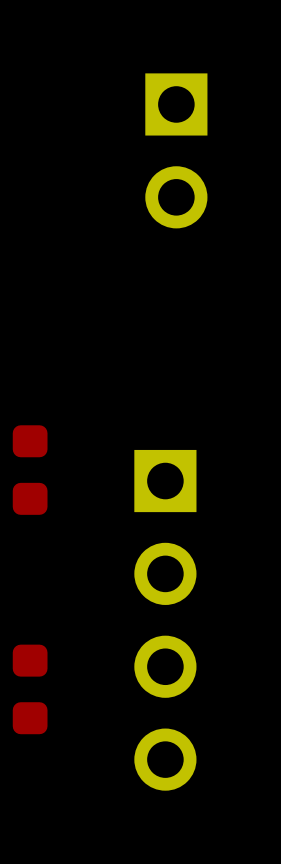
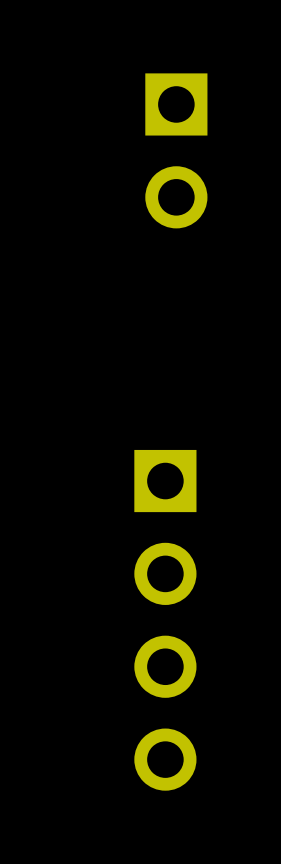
part: (30, 470) -> none
part: (30, 689) -> none

